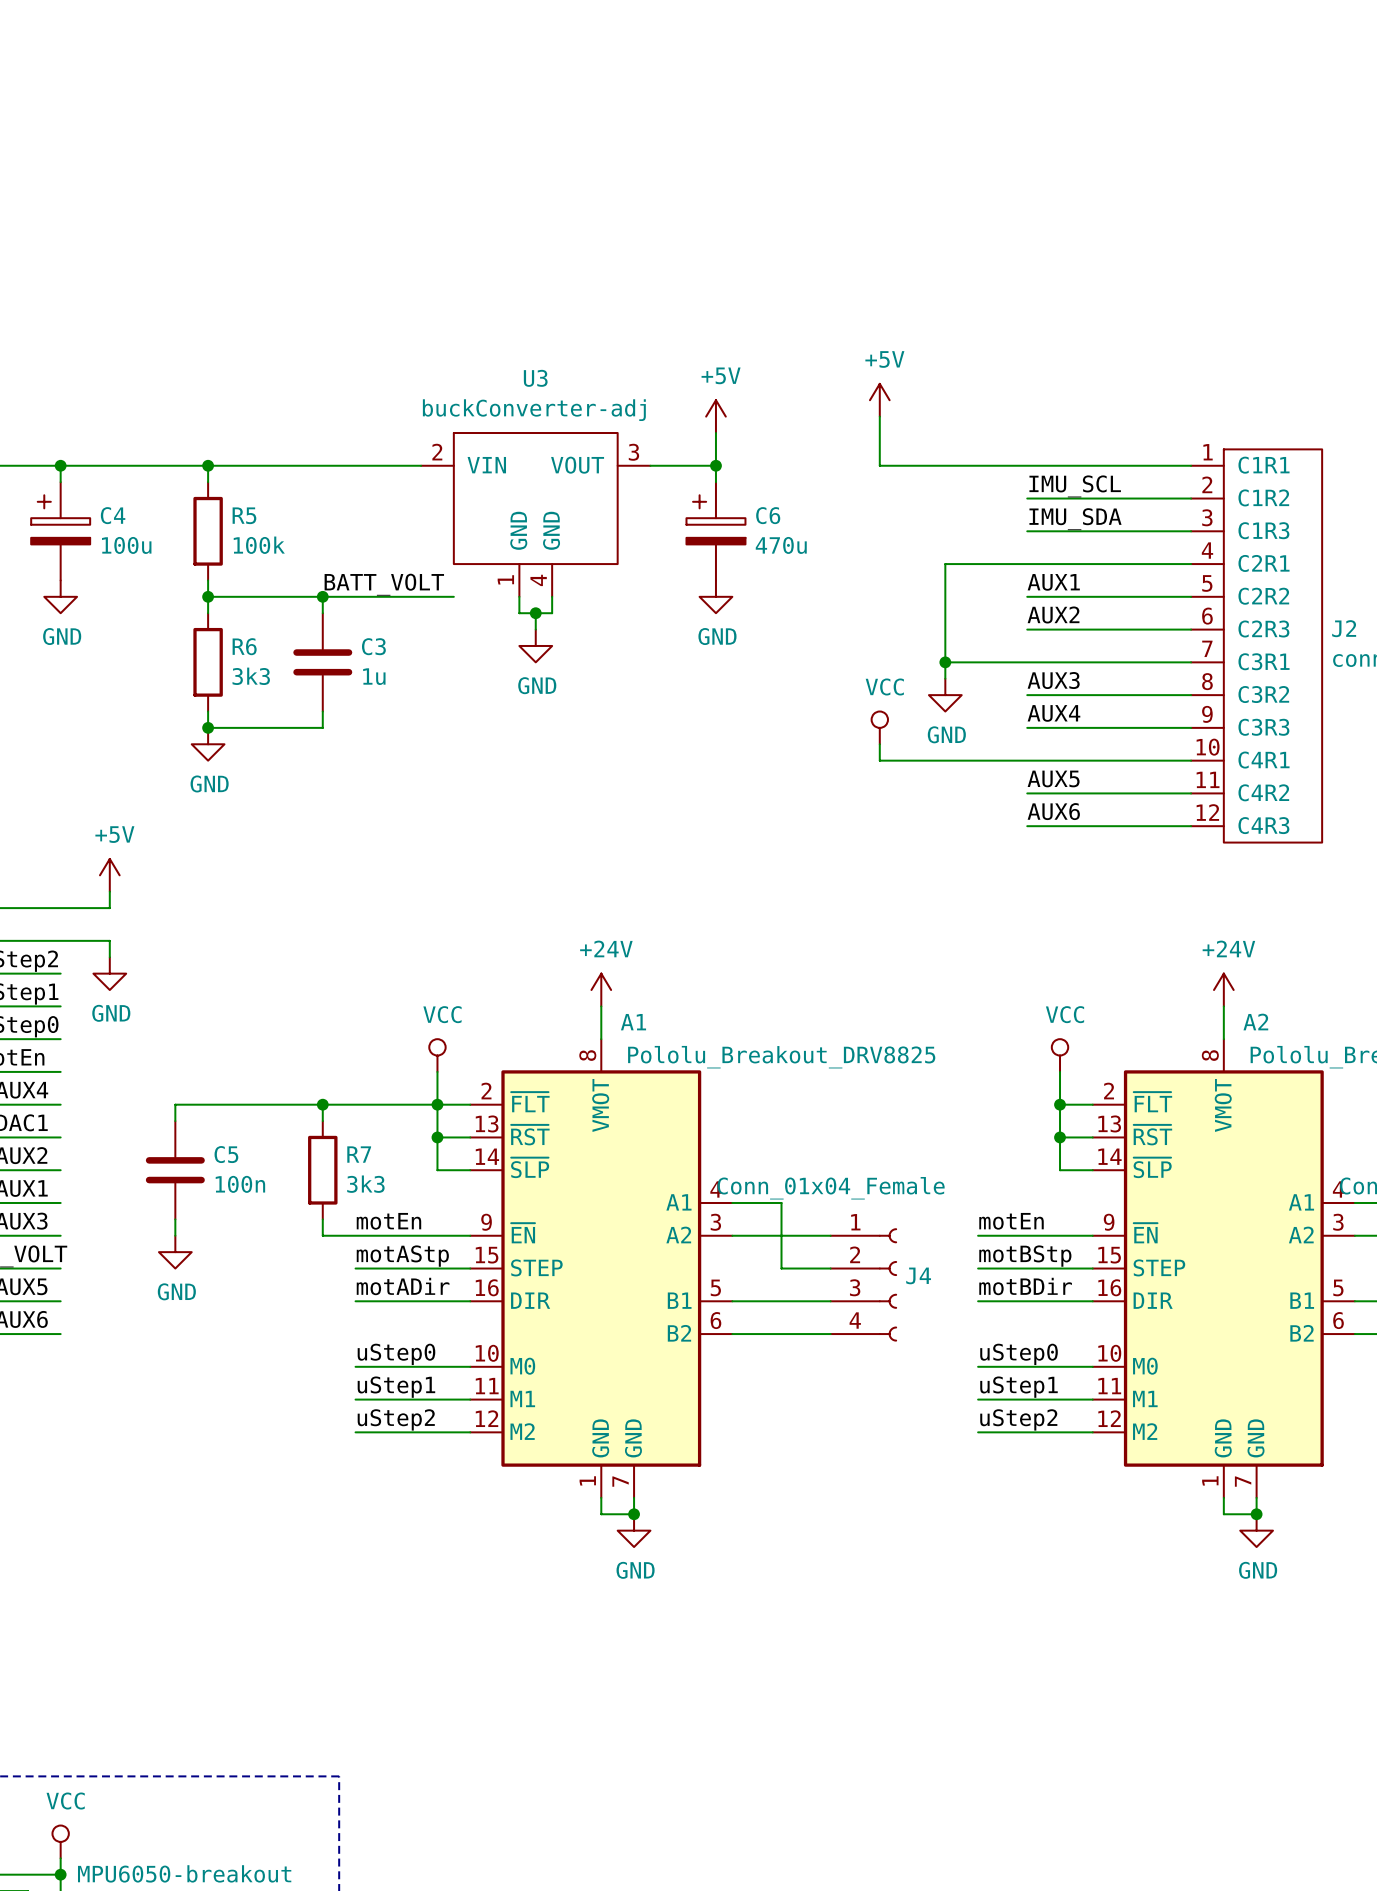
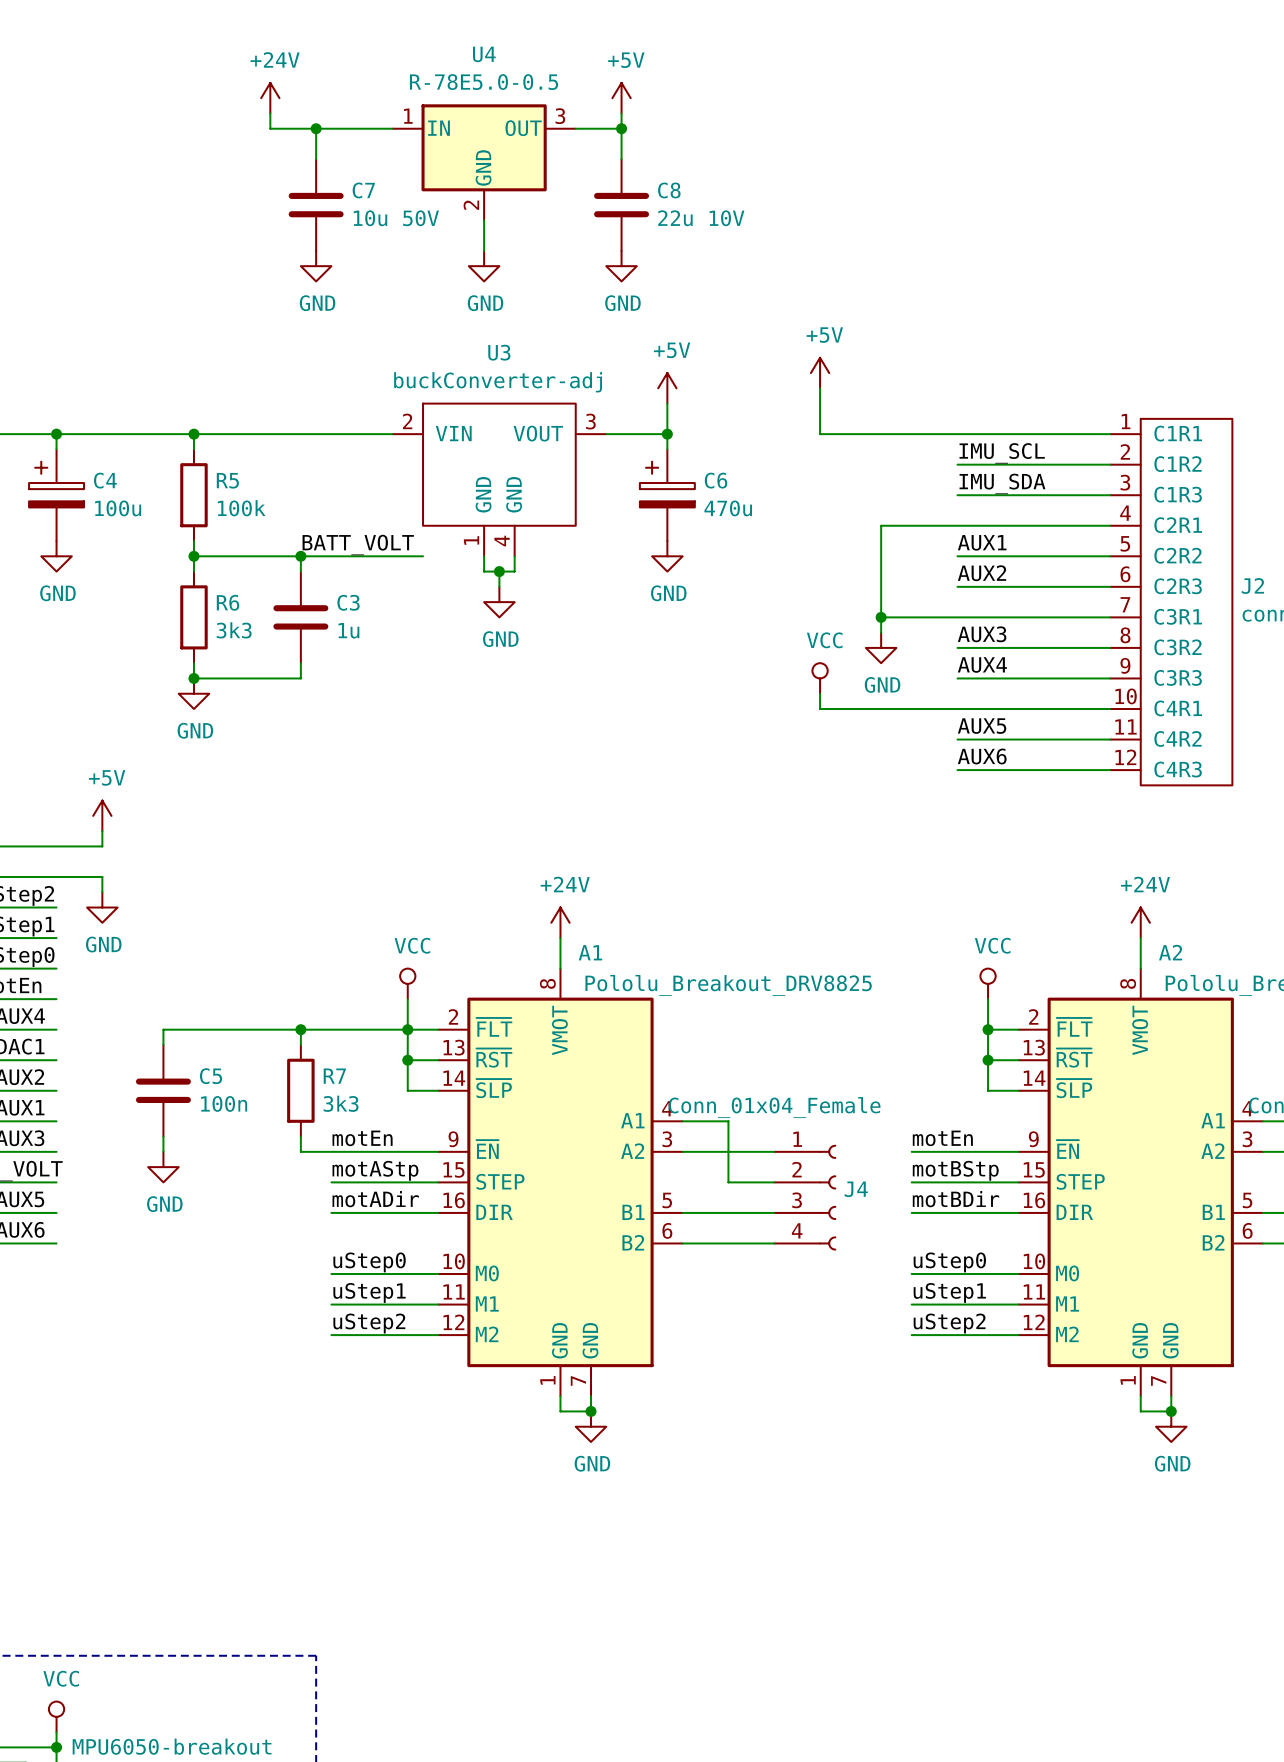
power symbol: none -> +24V (270, 98)
power symbol: none -> +5V (621, 98)
wire: none -> (270, 113) (270, 128) (392, 128)
wire: none -> (621, 113) (621, 159)
wire: none -> (316, 128) (316, 159)
junction: none -> (316, 128)
wire: none -> (575, 128) (621, 128)
junction: none -> (621, 128)
U4: none -> R-78E5.0-0.5 (484, 162)
C7: none -> 10u 50V (316, 205)
C8: none -> 22u 10V (621, 205)
wire: none -> (484, 220) (484, 250)
power symbol: none -> GND (316, 266)
power symbol: none -> GND (484, 266)
power symbol: none -> GND (621, 266)

